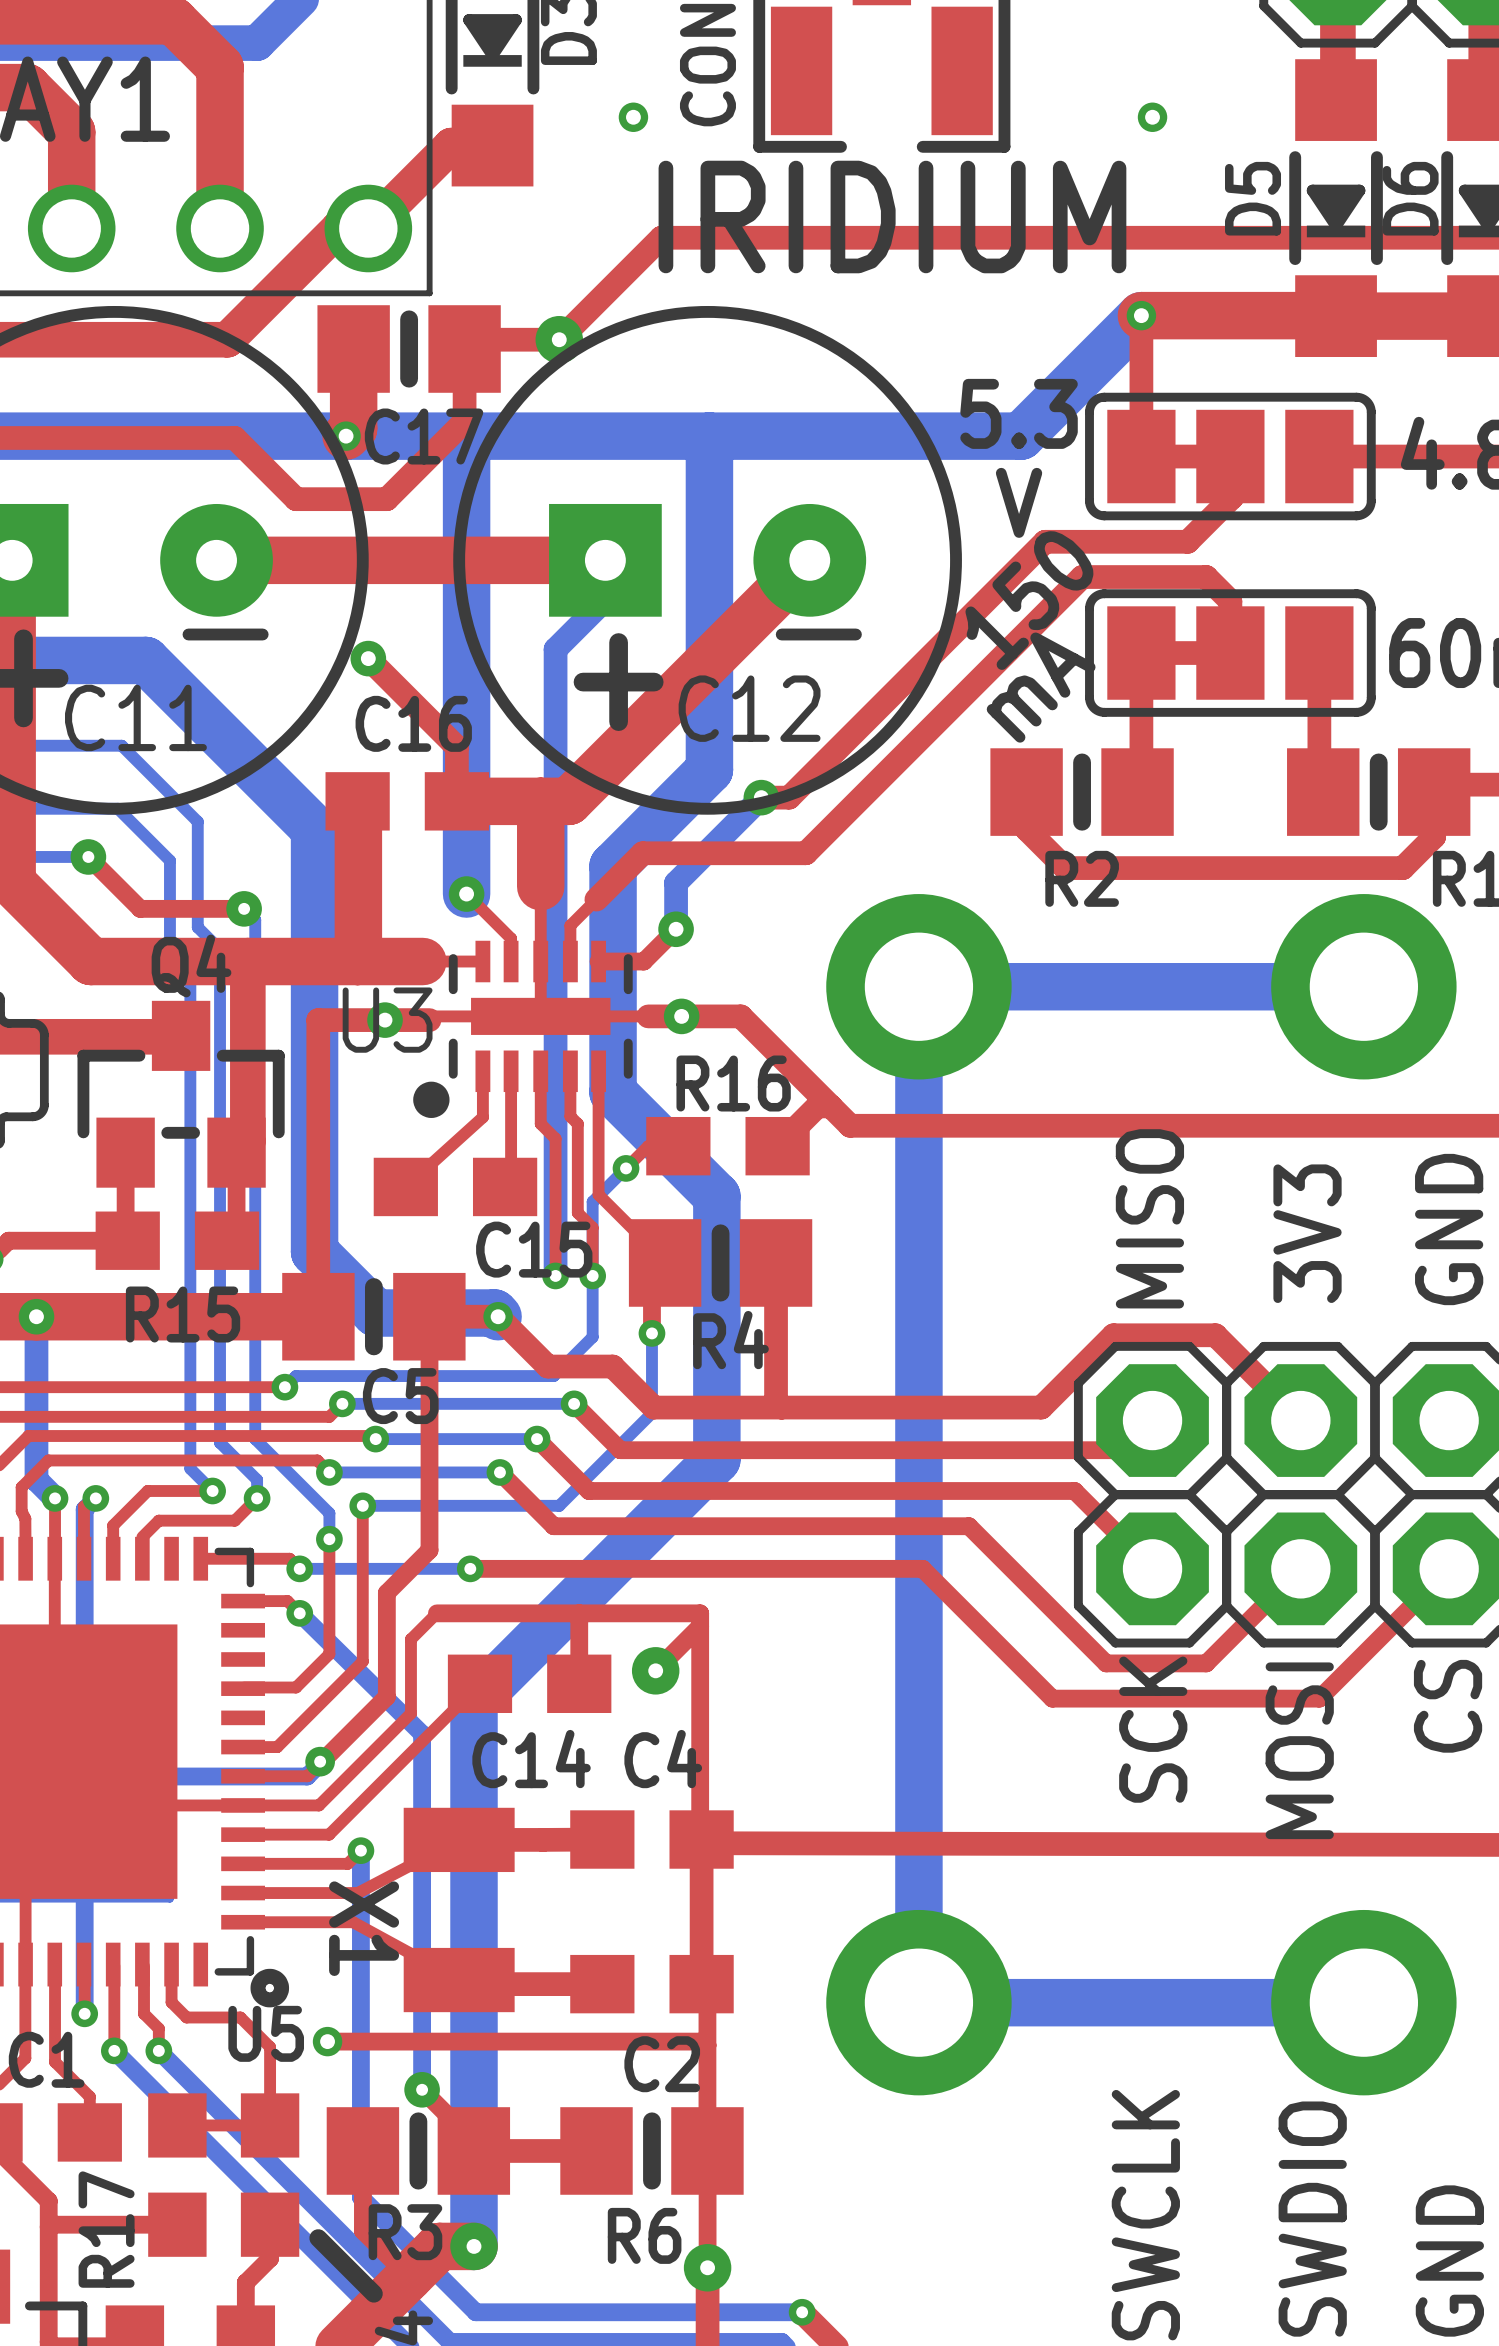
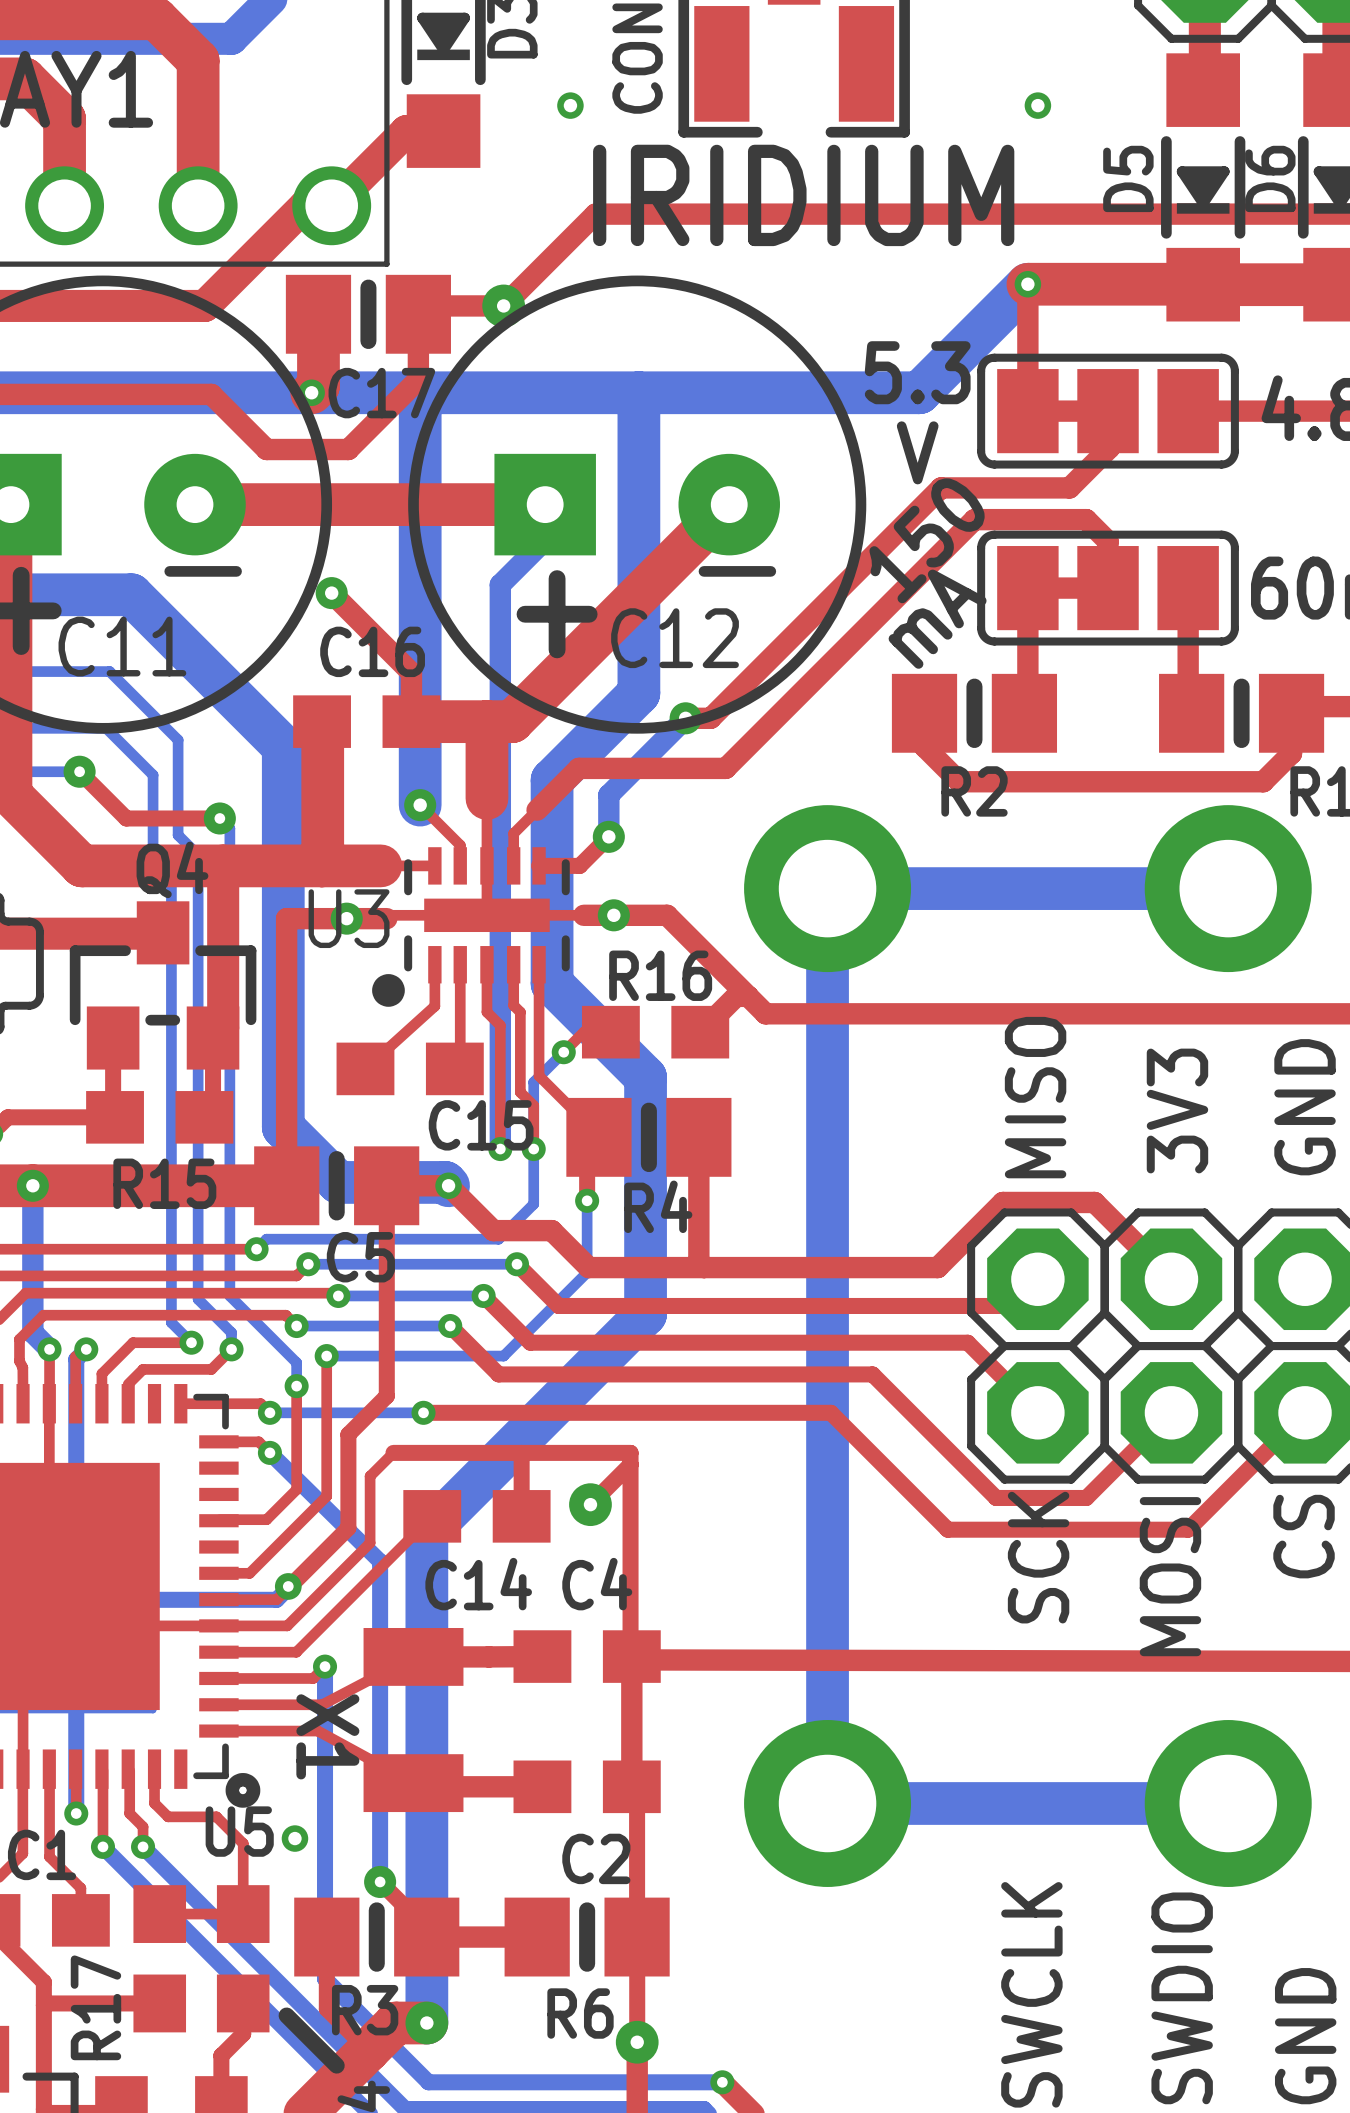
top track: (327, 2041) (703, 2041) (707, 2045) -> none

